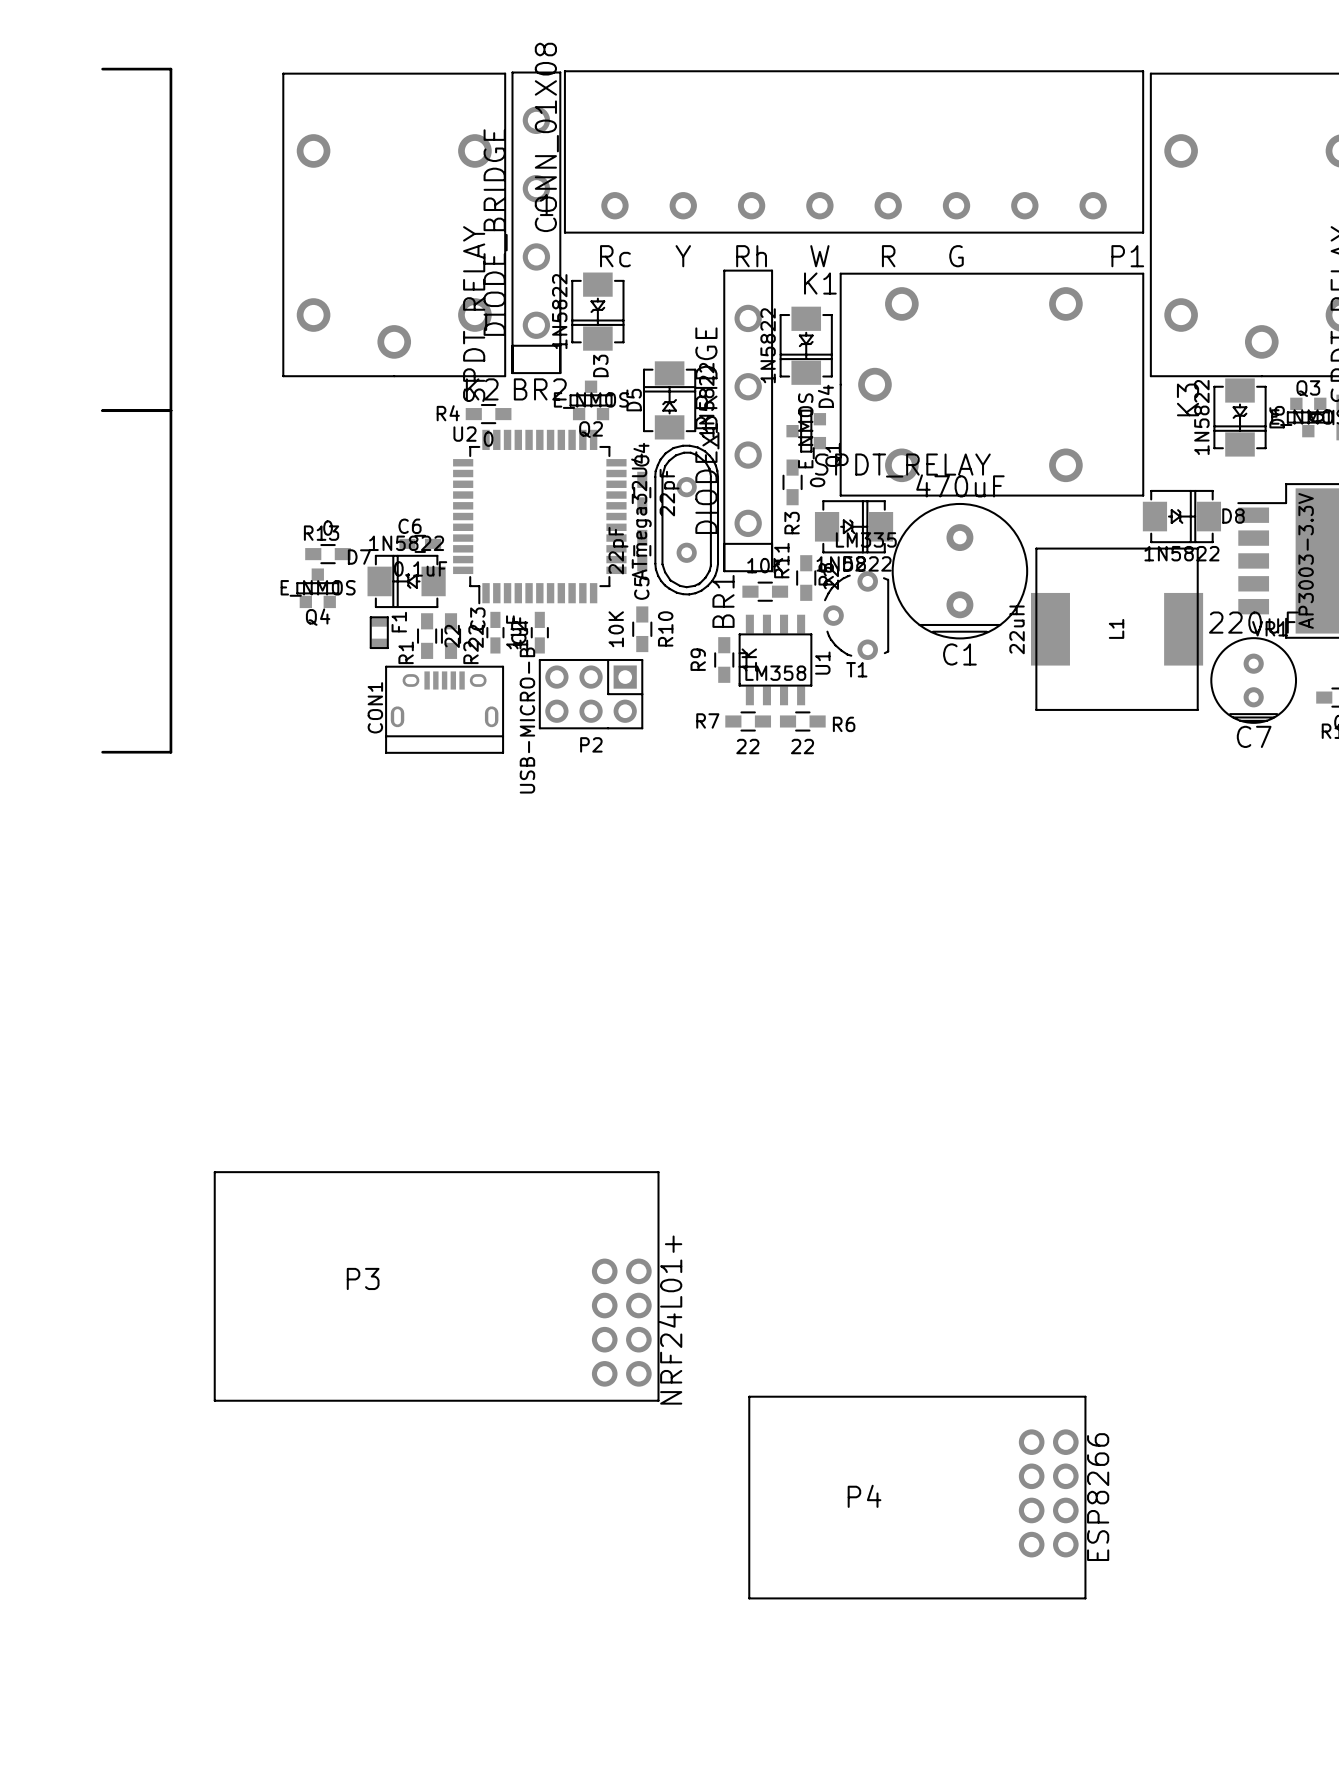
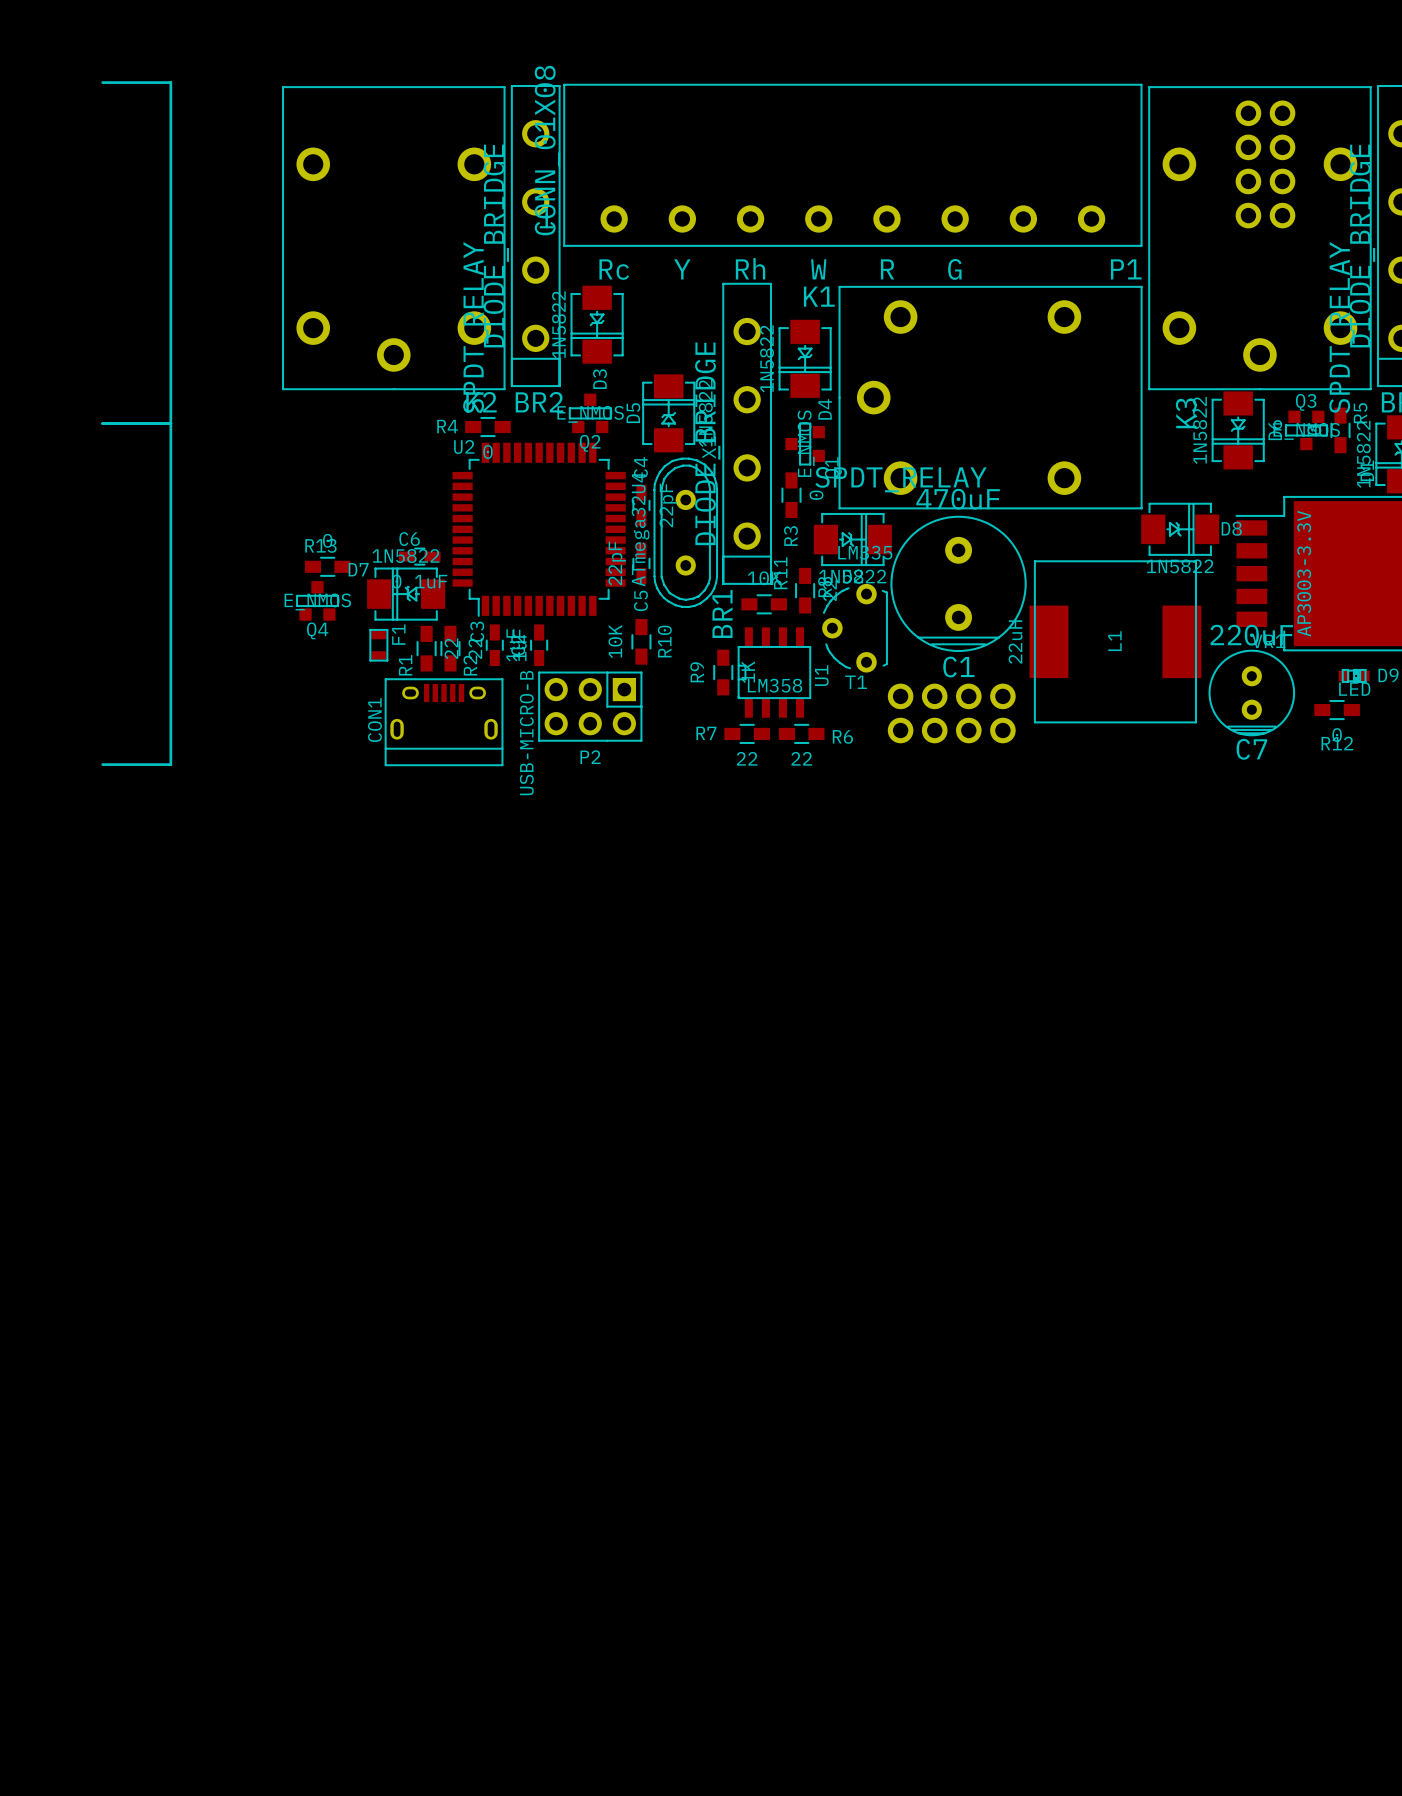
part: none -> (1265, 164)
part: none -> (951, 713)
P3: NRF24L01+ (436, 1286) -> none
P4: ESP8266 (917, 1497) -> none

